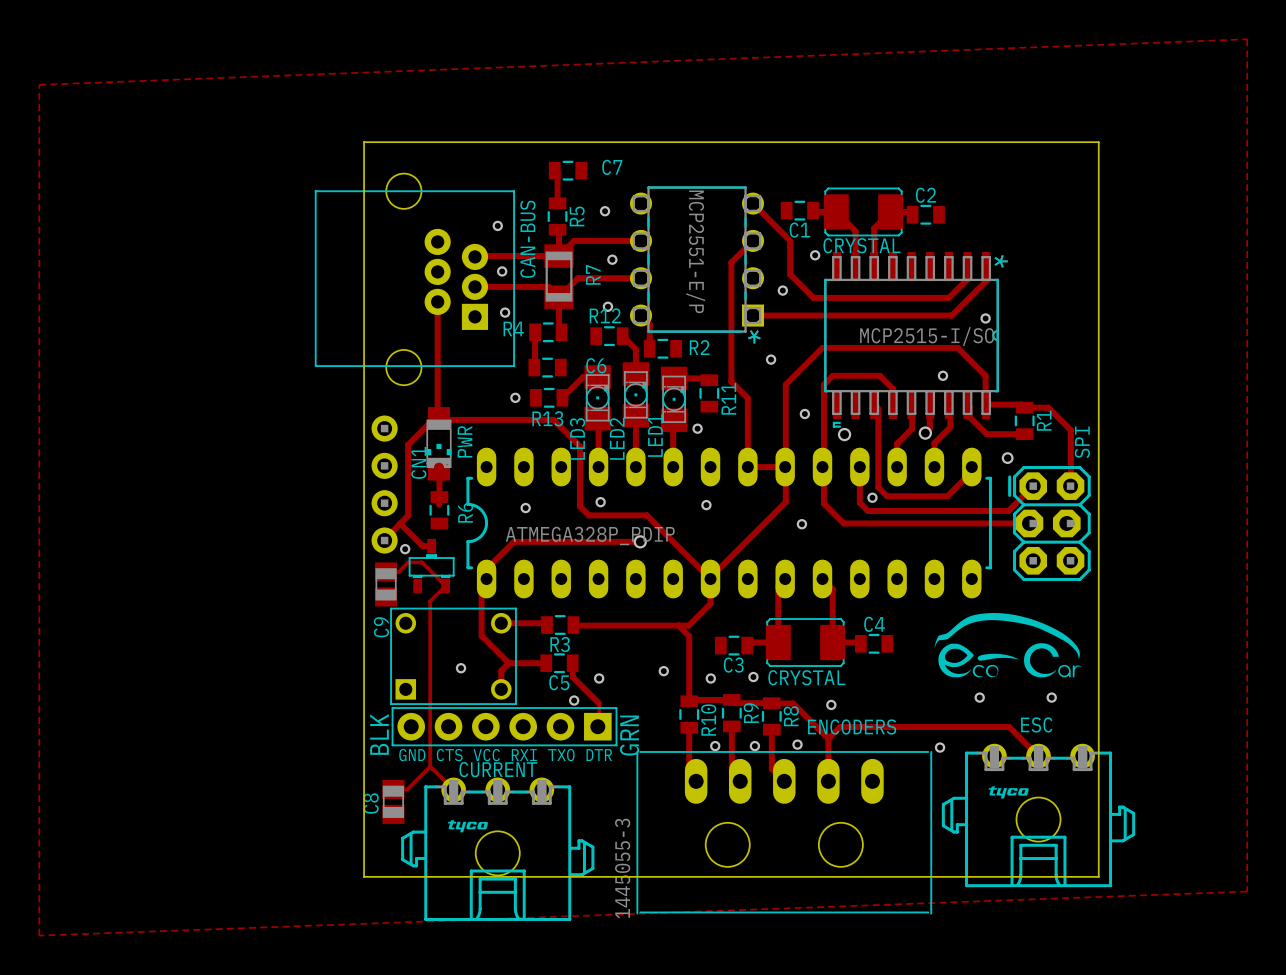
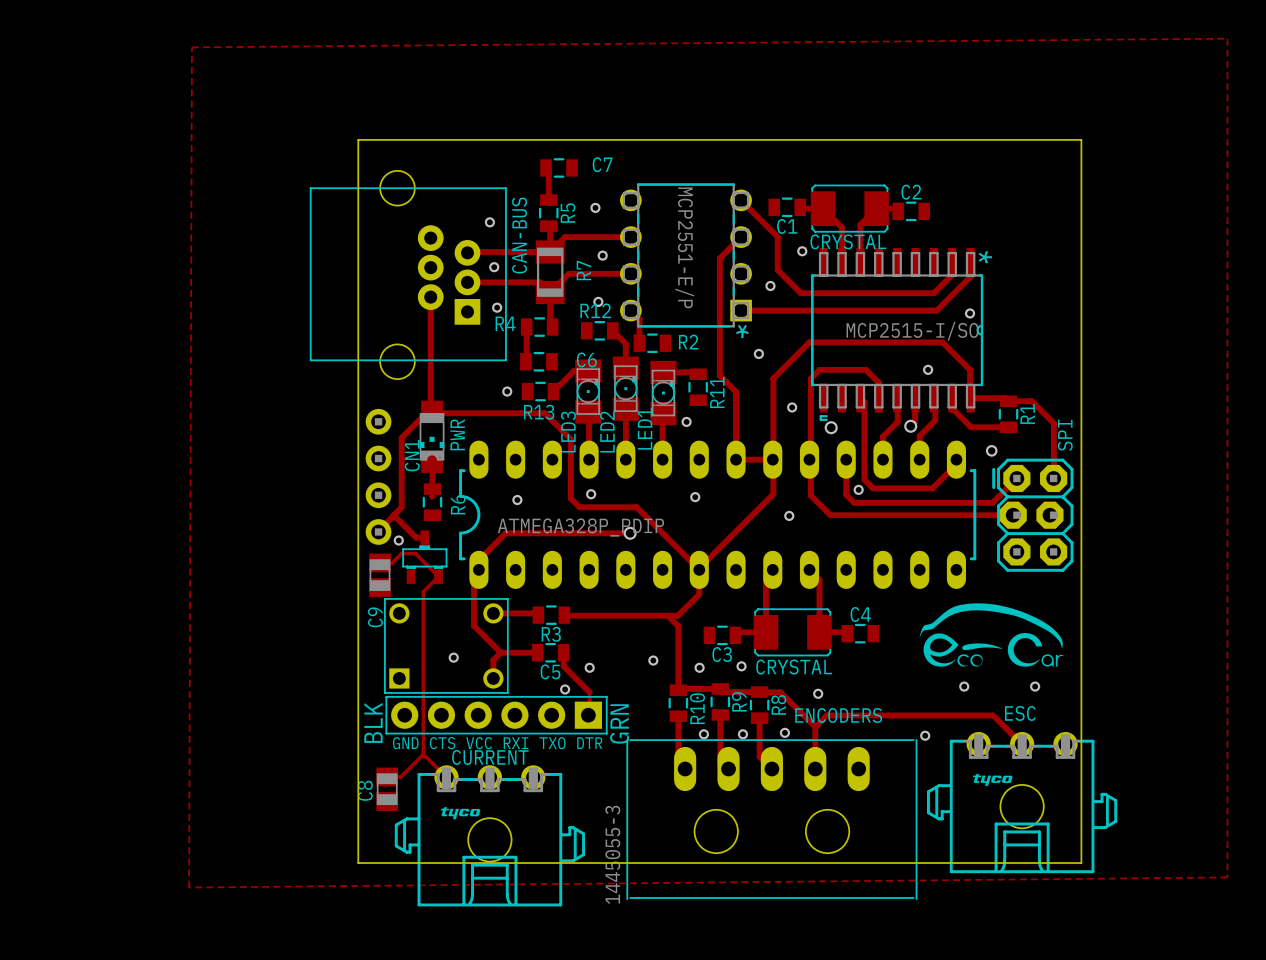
zone outline: (1247, 39) (39, 84) (39, 935) (1247, 891) -> (1227, 38) (191, 47) (189, 887) (1227, 877)

